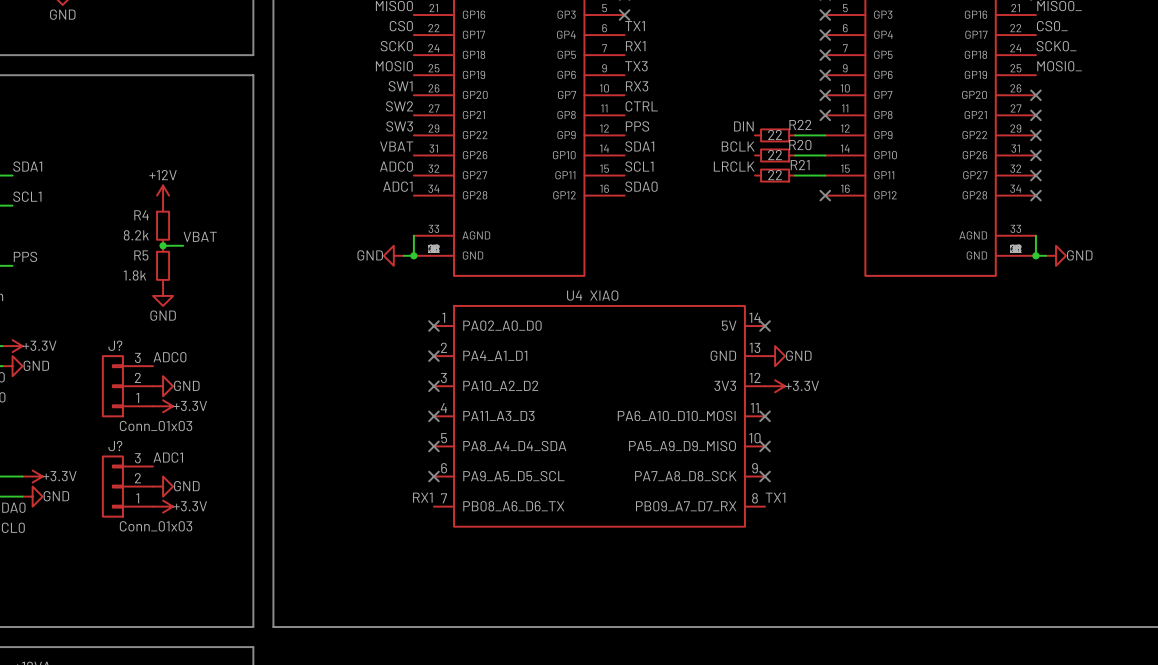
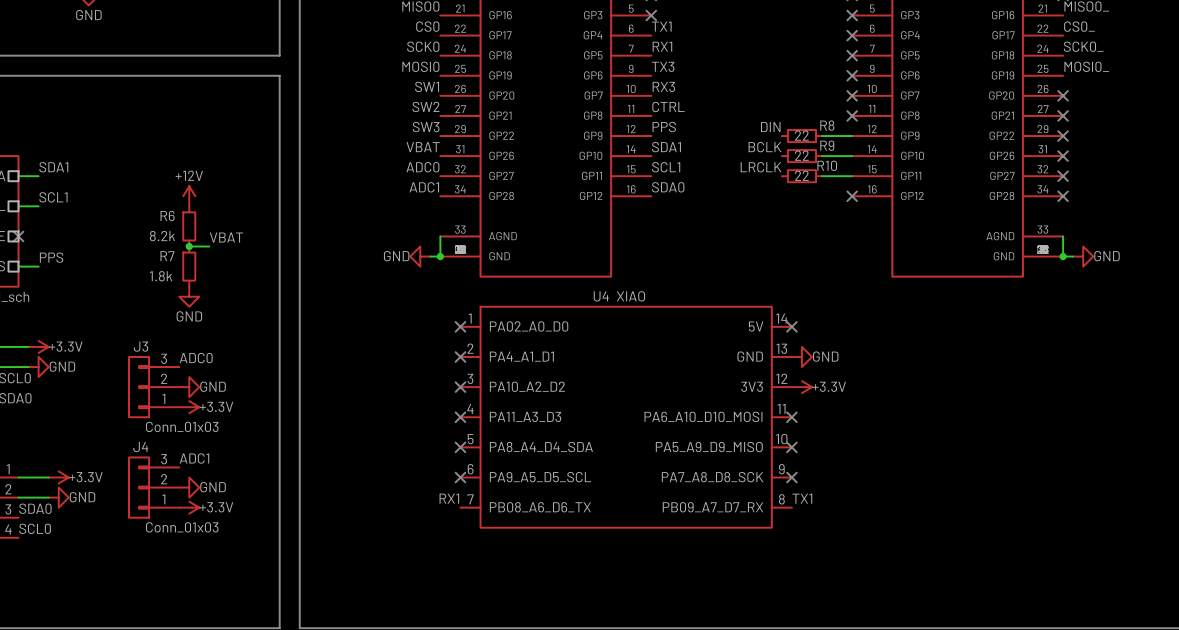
R22 name: R22 (800, 124) -> R8 (827, 125)
R20 name: R20 (800, 145) -> R9 (827, 145)
R21 name: R21 (800, 165) -> R10 (827, 165)
R4 name: R4 (141, 215) -> R6 (167, 215)
R5 name: R5 (141, 255) -> R7 (167, 256)
J? name: J? (115, 345) -> J3 (141, 346)
J? name: J? (115, 446) -> J4 (140, 447)

